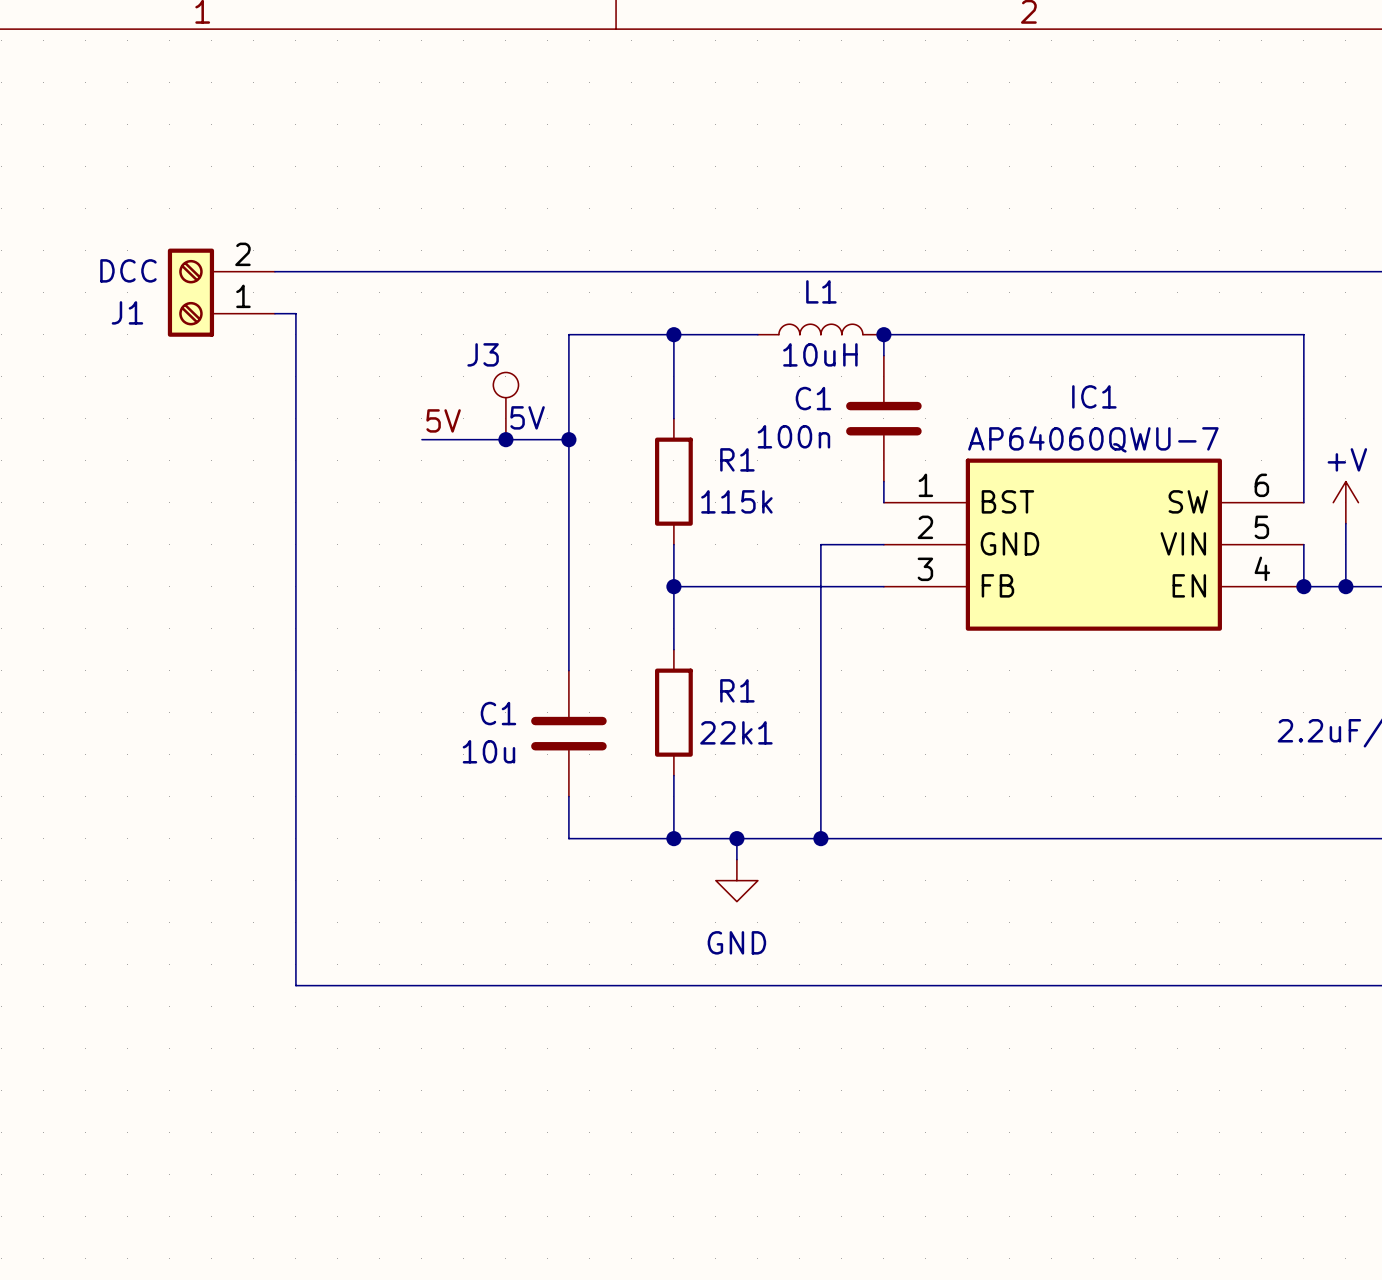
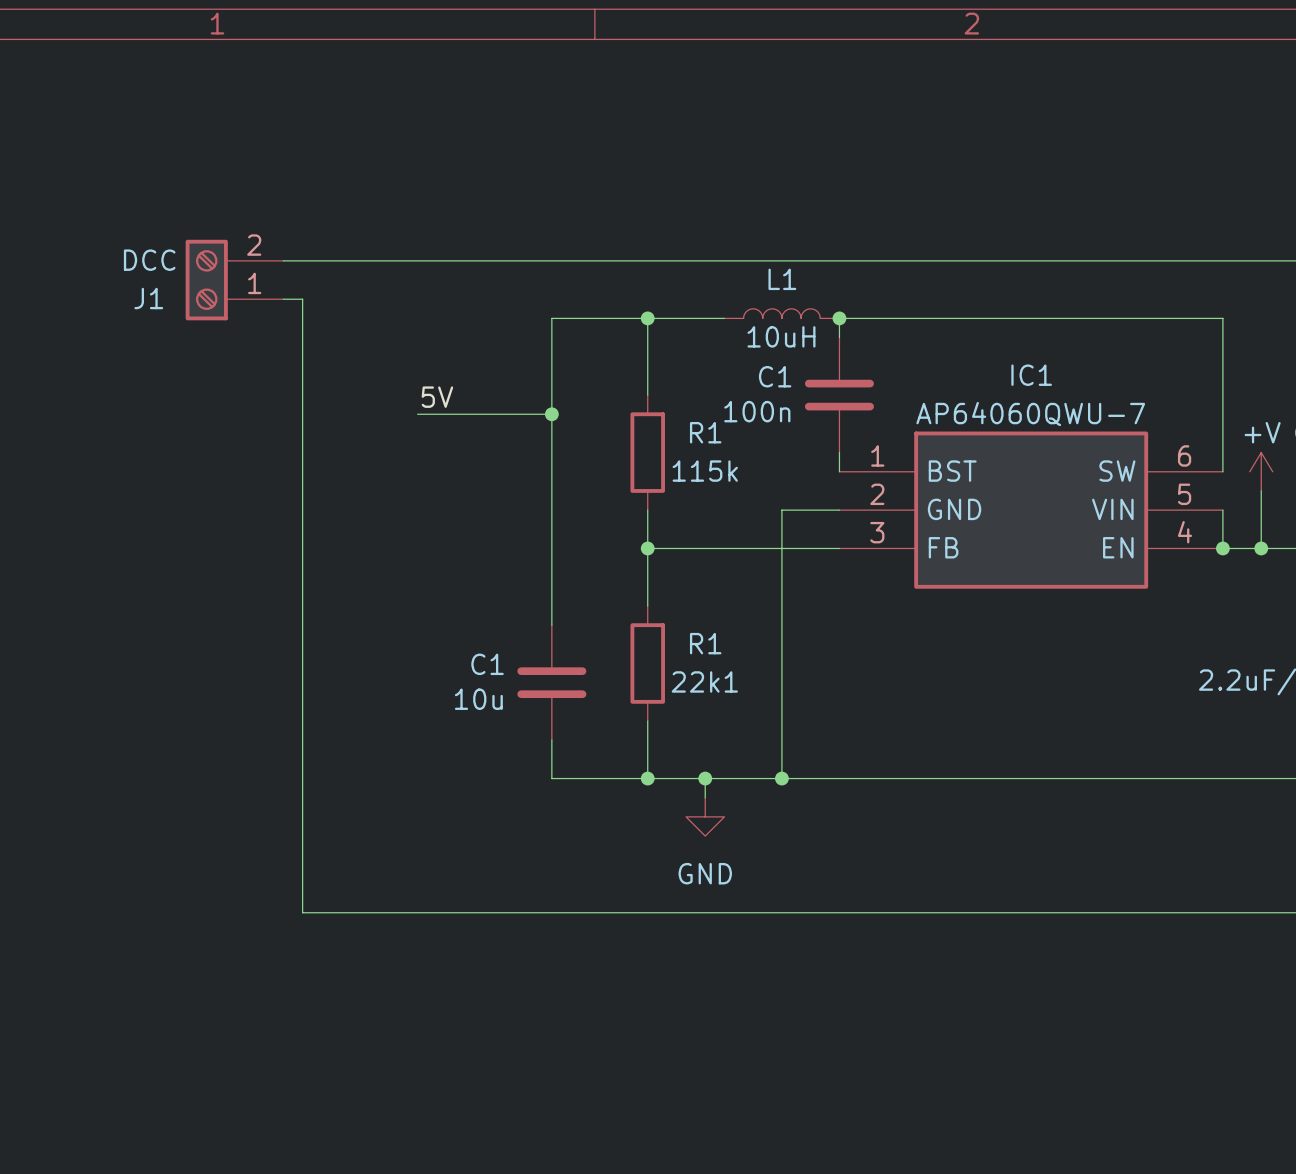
J3: 5V (505, 406) -> none
junction: (505, 439) -> none

